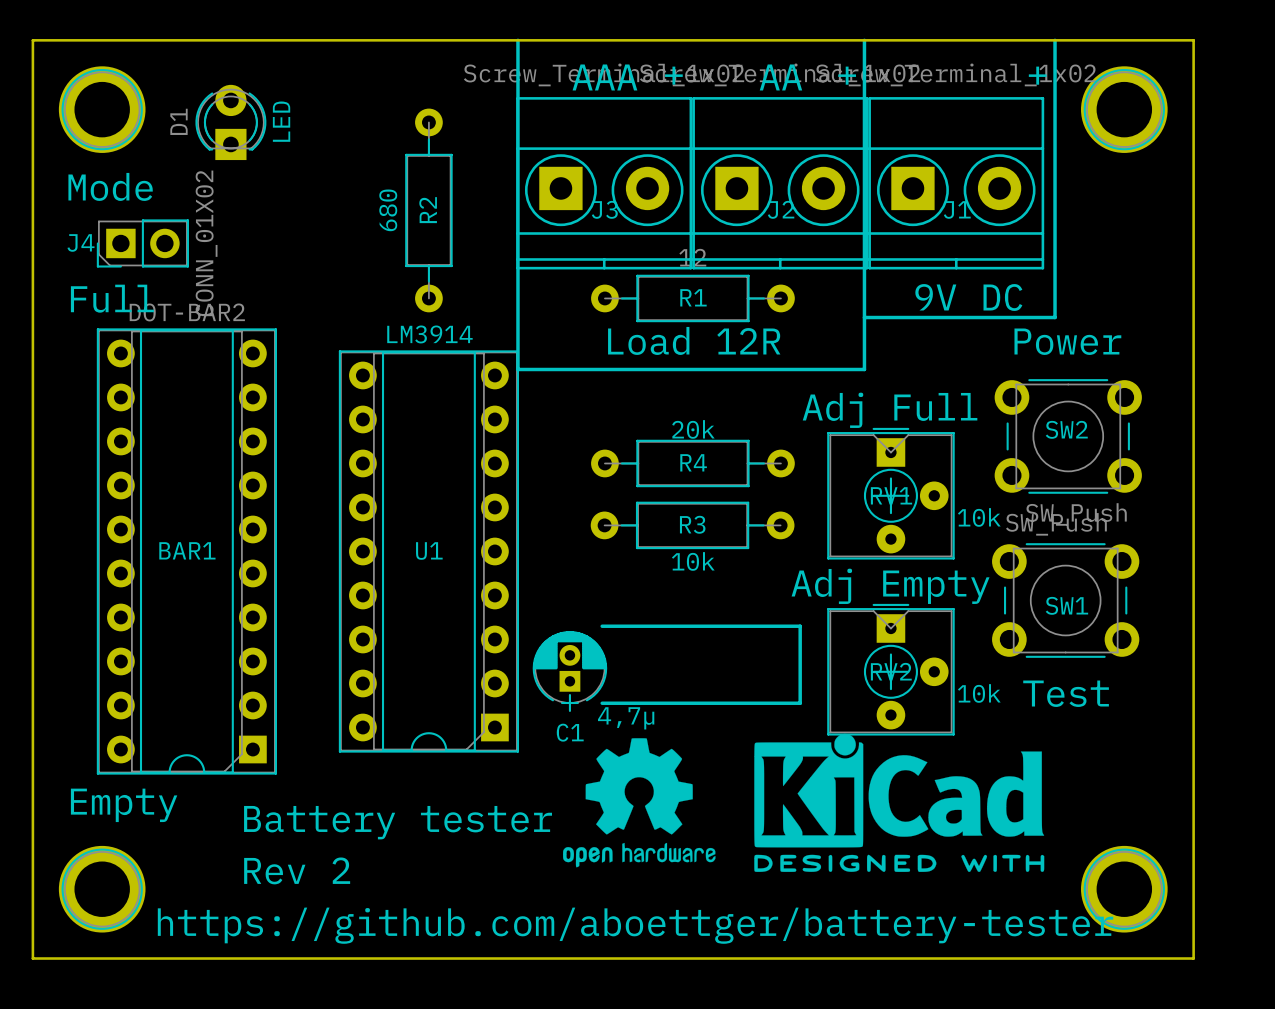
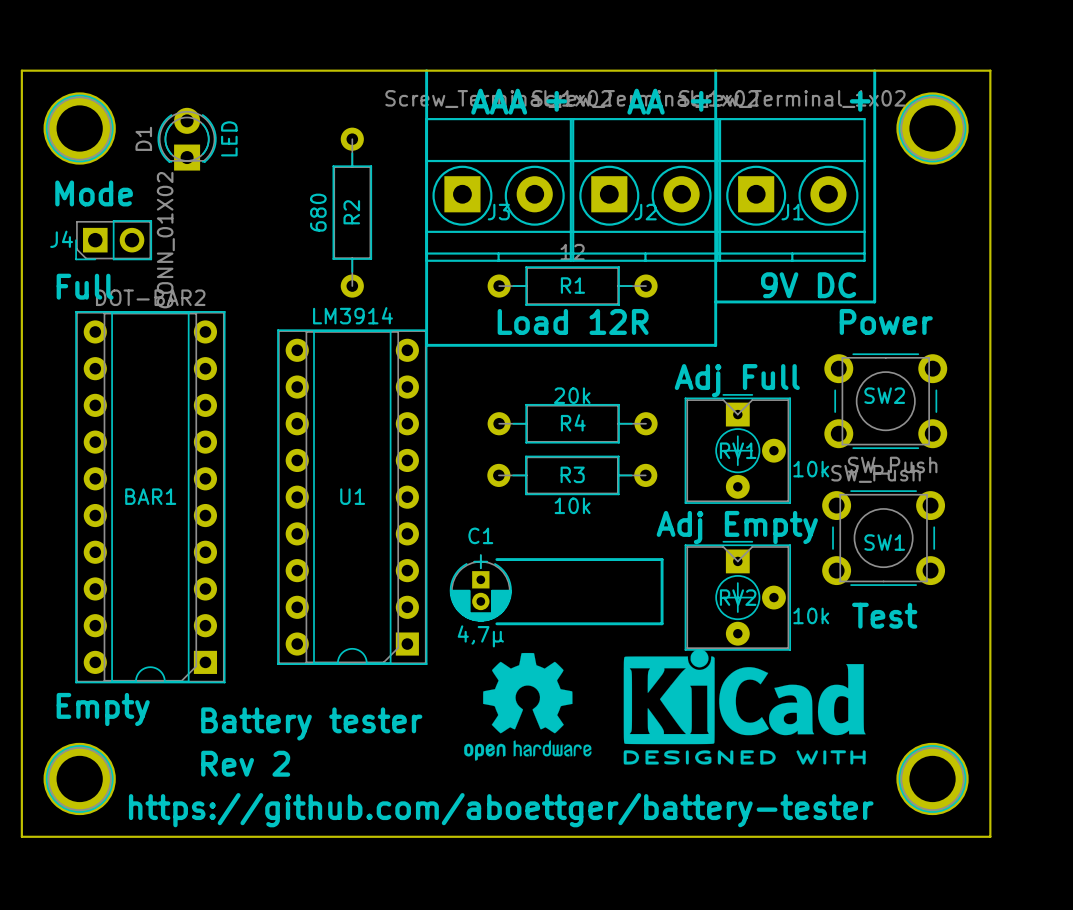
C1 rotation: 0° (569, 671) -> 180° (480, 588)
C1 value position: 4,7µ (626, 718) -> 4,7µ (480, 636)

